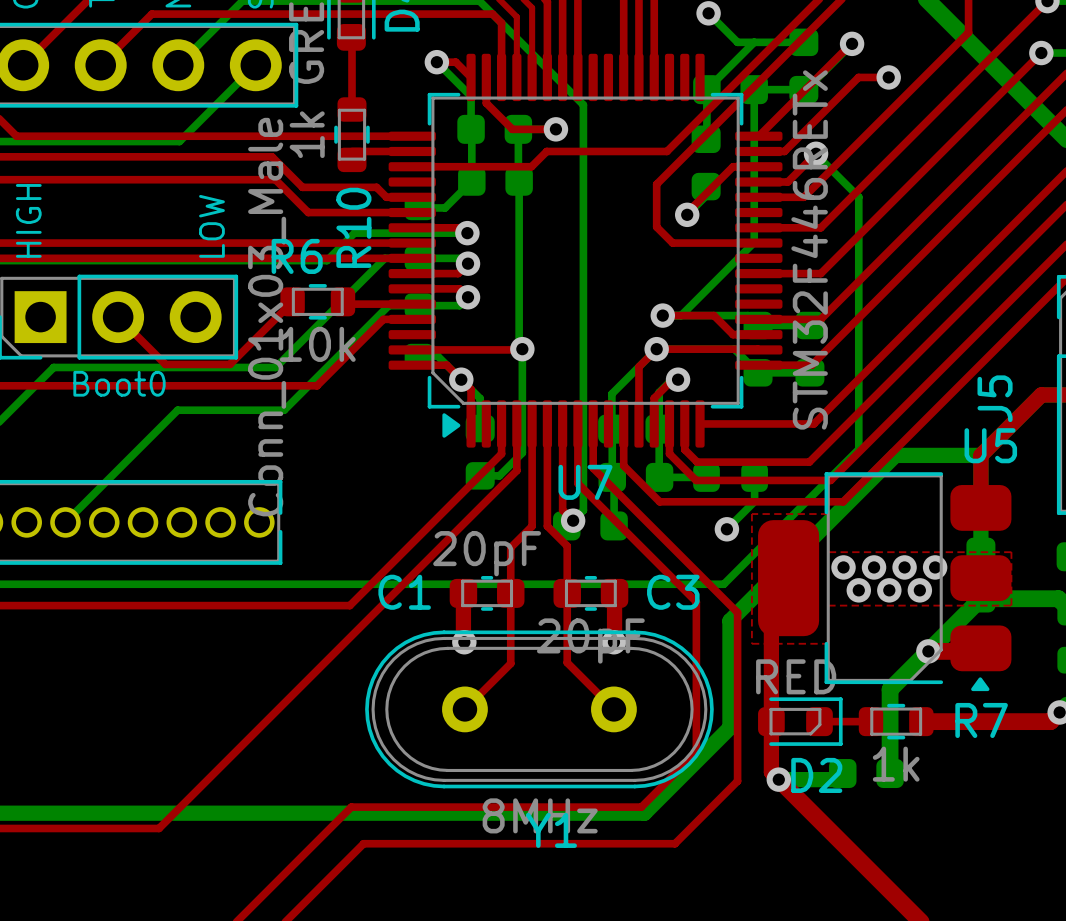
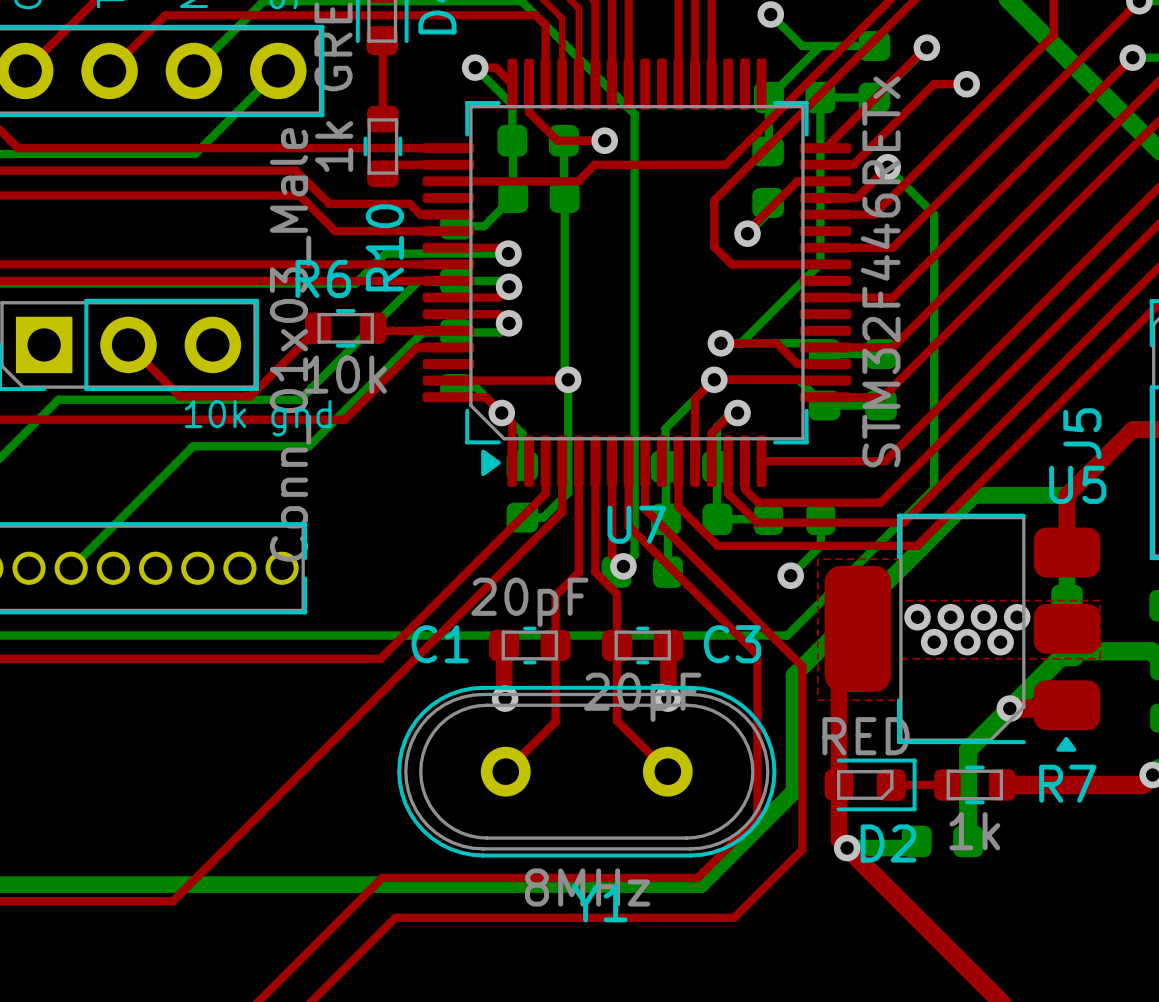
text: HIGH (28, 220) -> none
text: LOW (211, 226) -> none
text: Boot0 (119, 383) -> none
text: none -> 10k gnd (258, 418)

